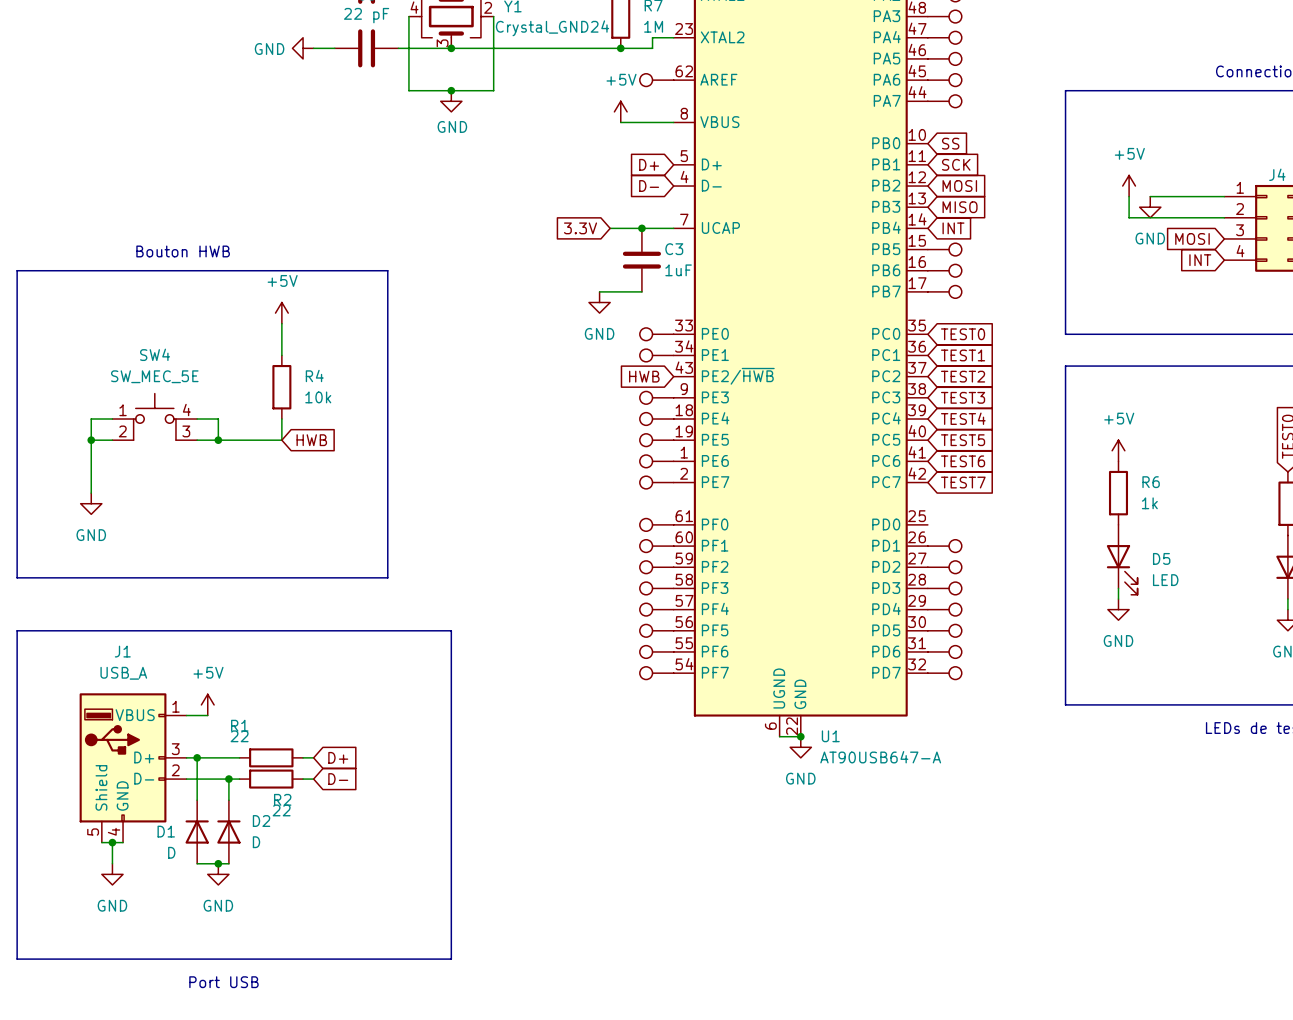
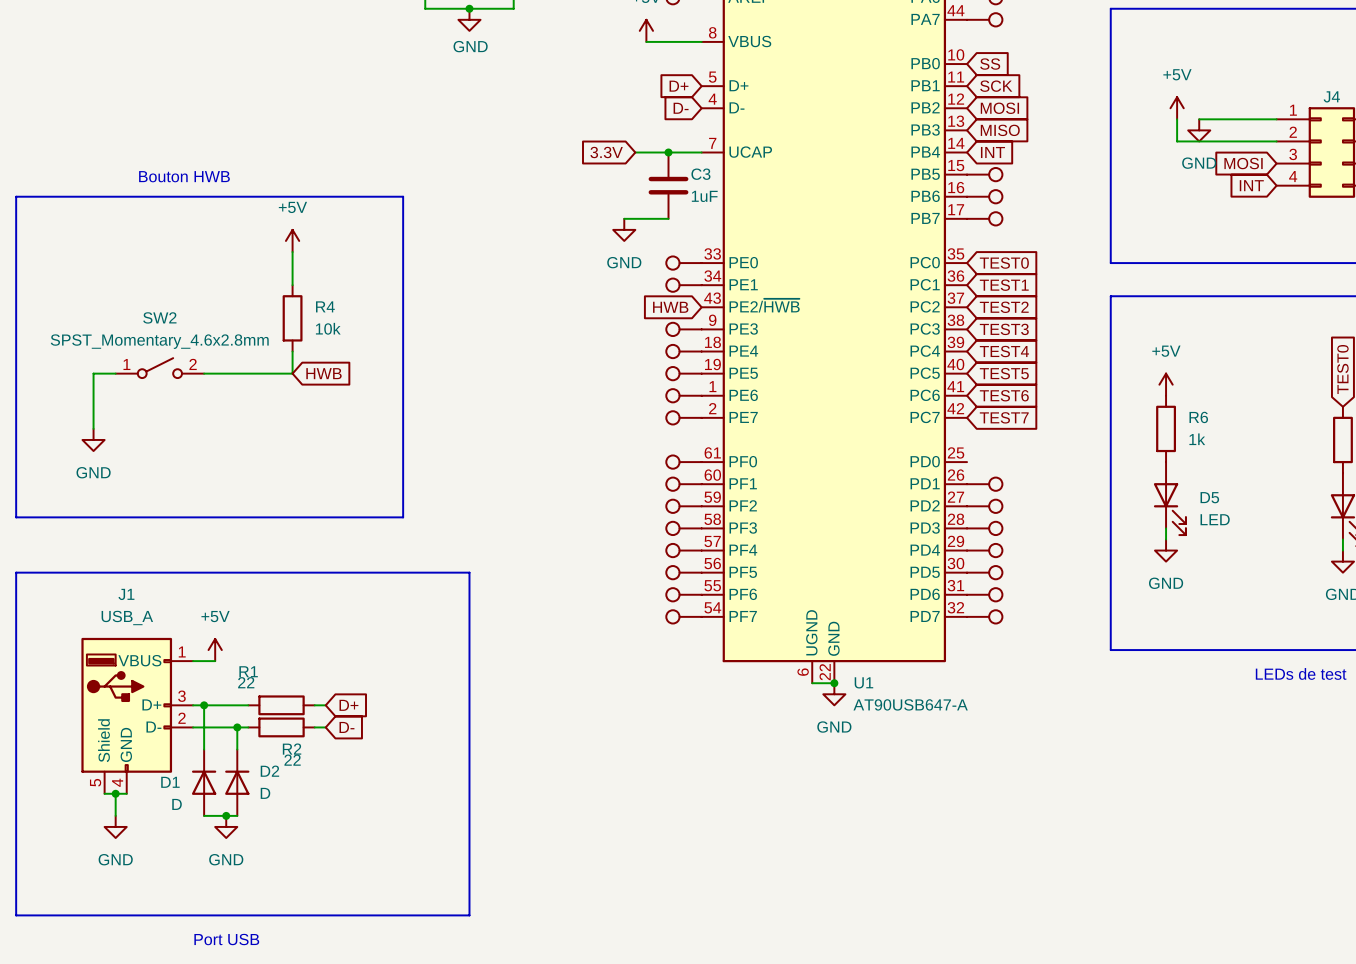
SW4: SW_MEC_5E (154, 416) -> none
wire: (112, 419) (91, 419) (91, 440) -> none
wire: (197, 419) (218, 419) (218, 440) -> none
SW2: none -> SPST_Momentary_4.6x2.8mm (159, 368)
junction: (91, 440) -> none
junction: (218, 440) -> none

